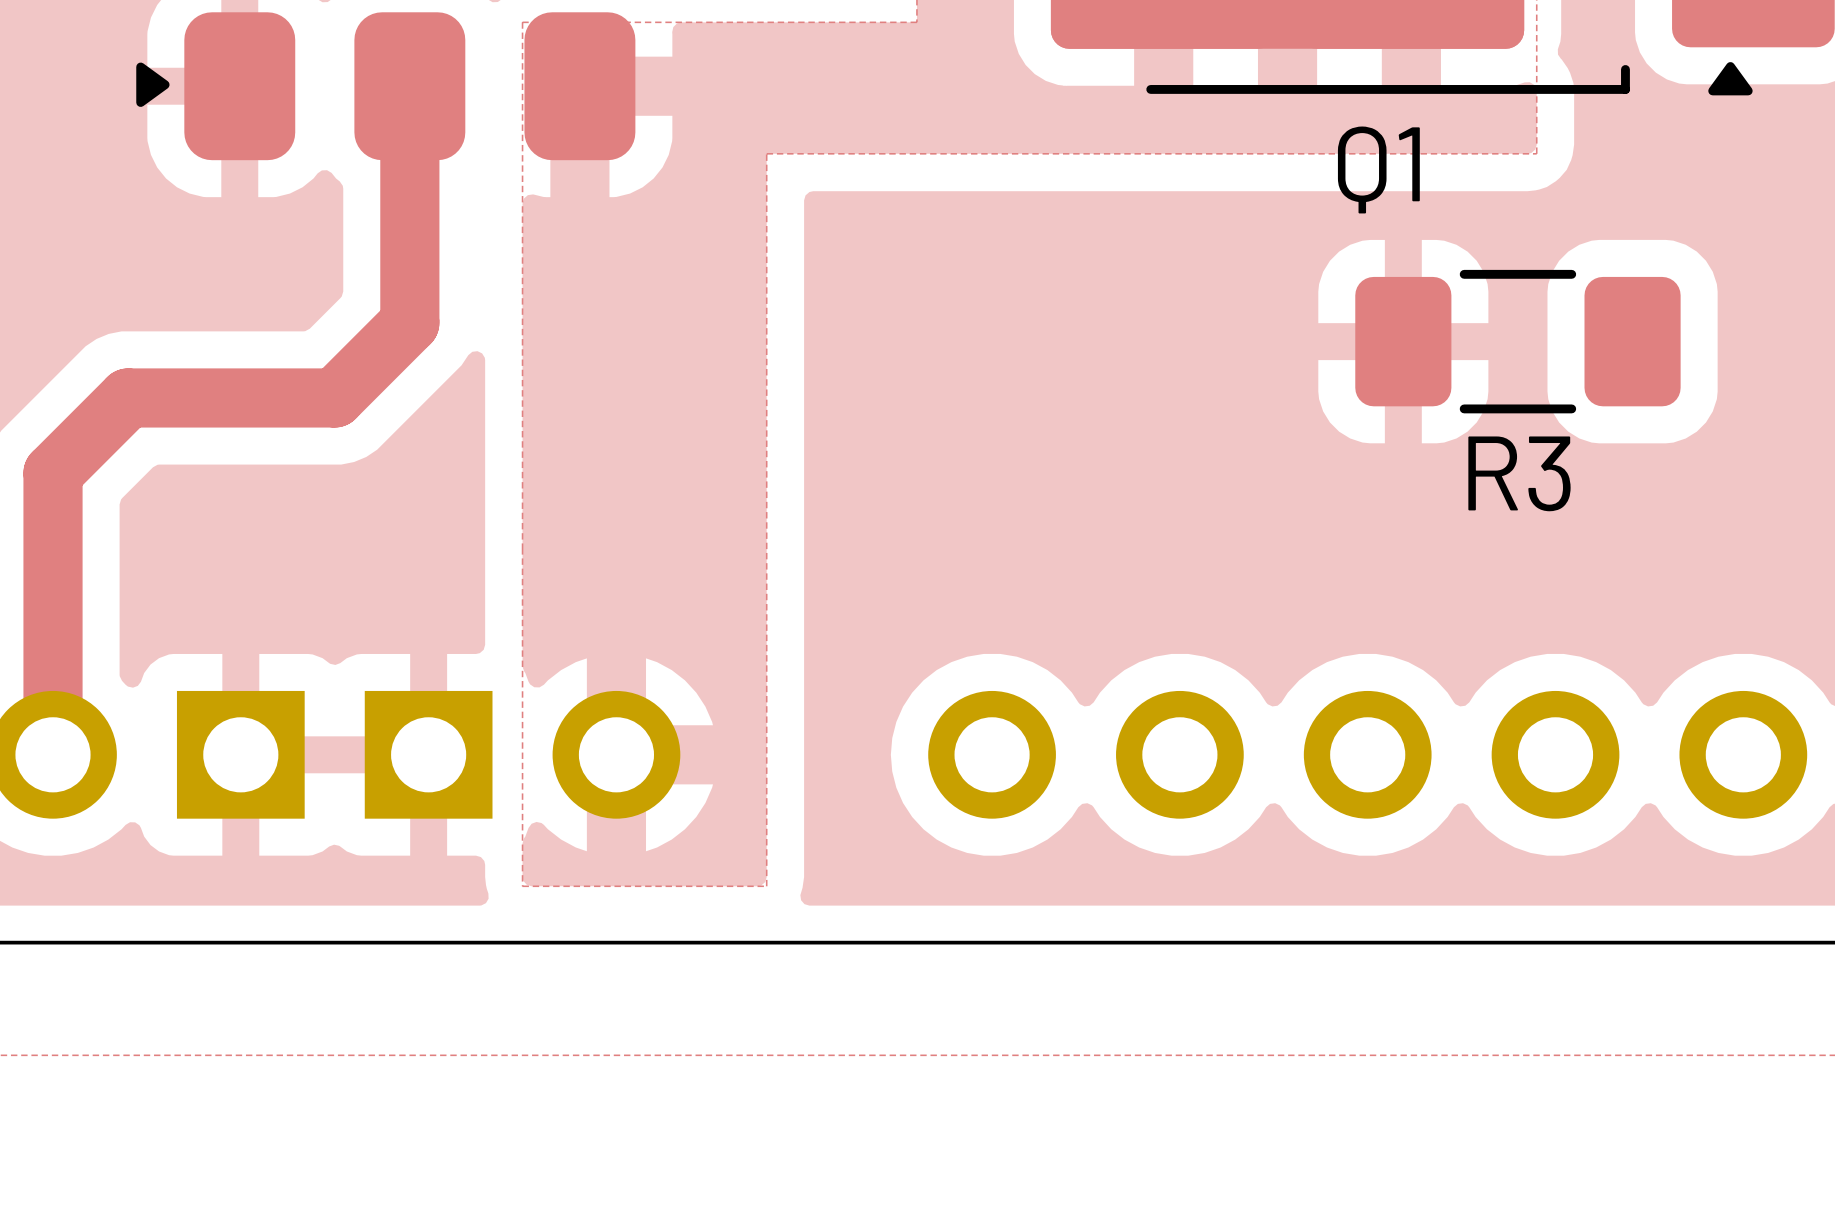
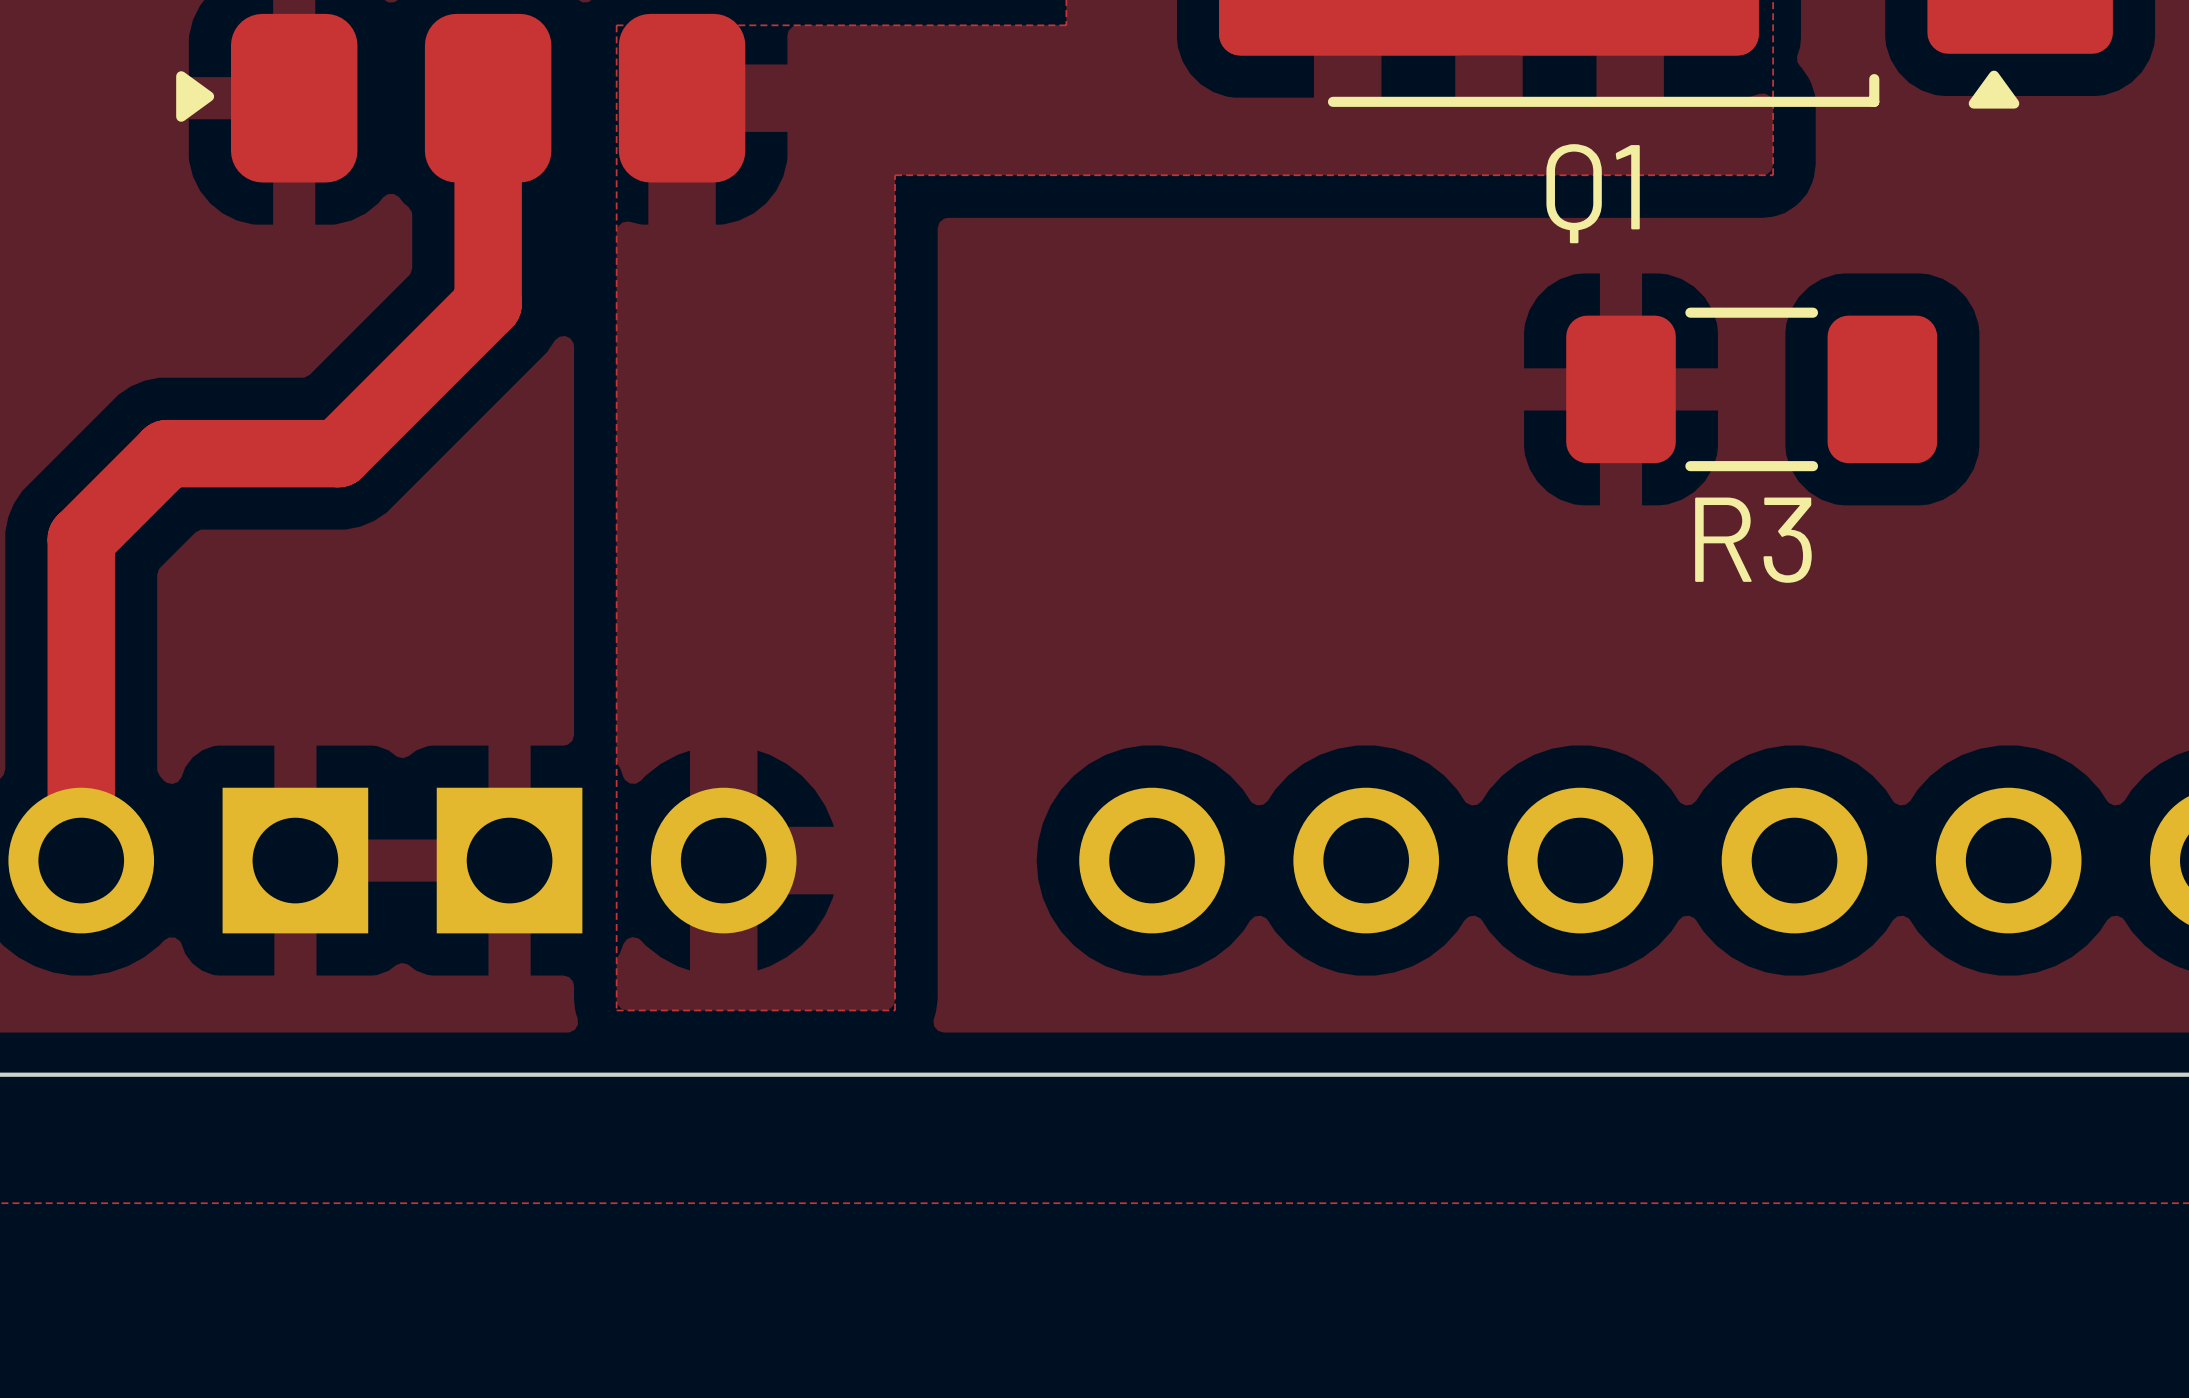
top track: (409, 266) (409, 322) (334, 397) (278, 397) -> (488, 303) (338, 453)

